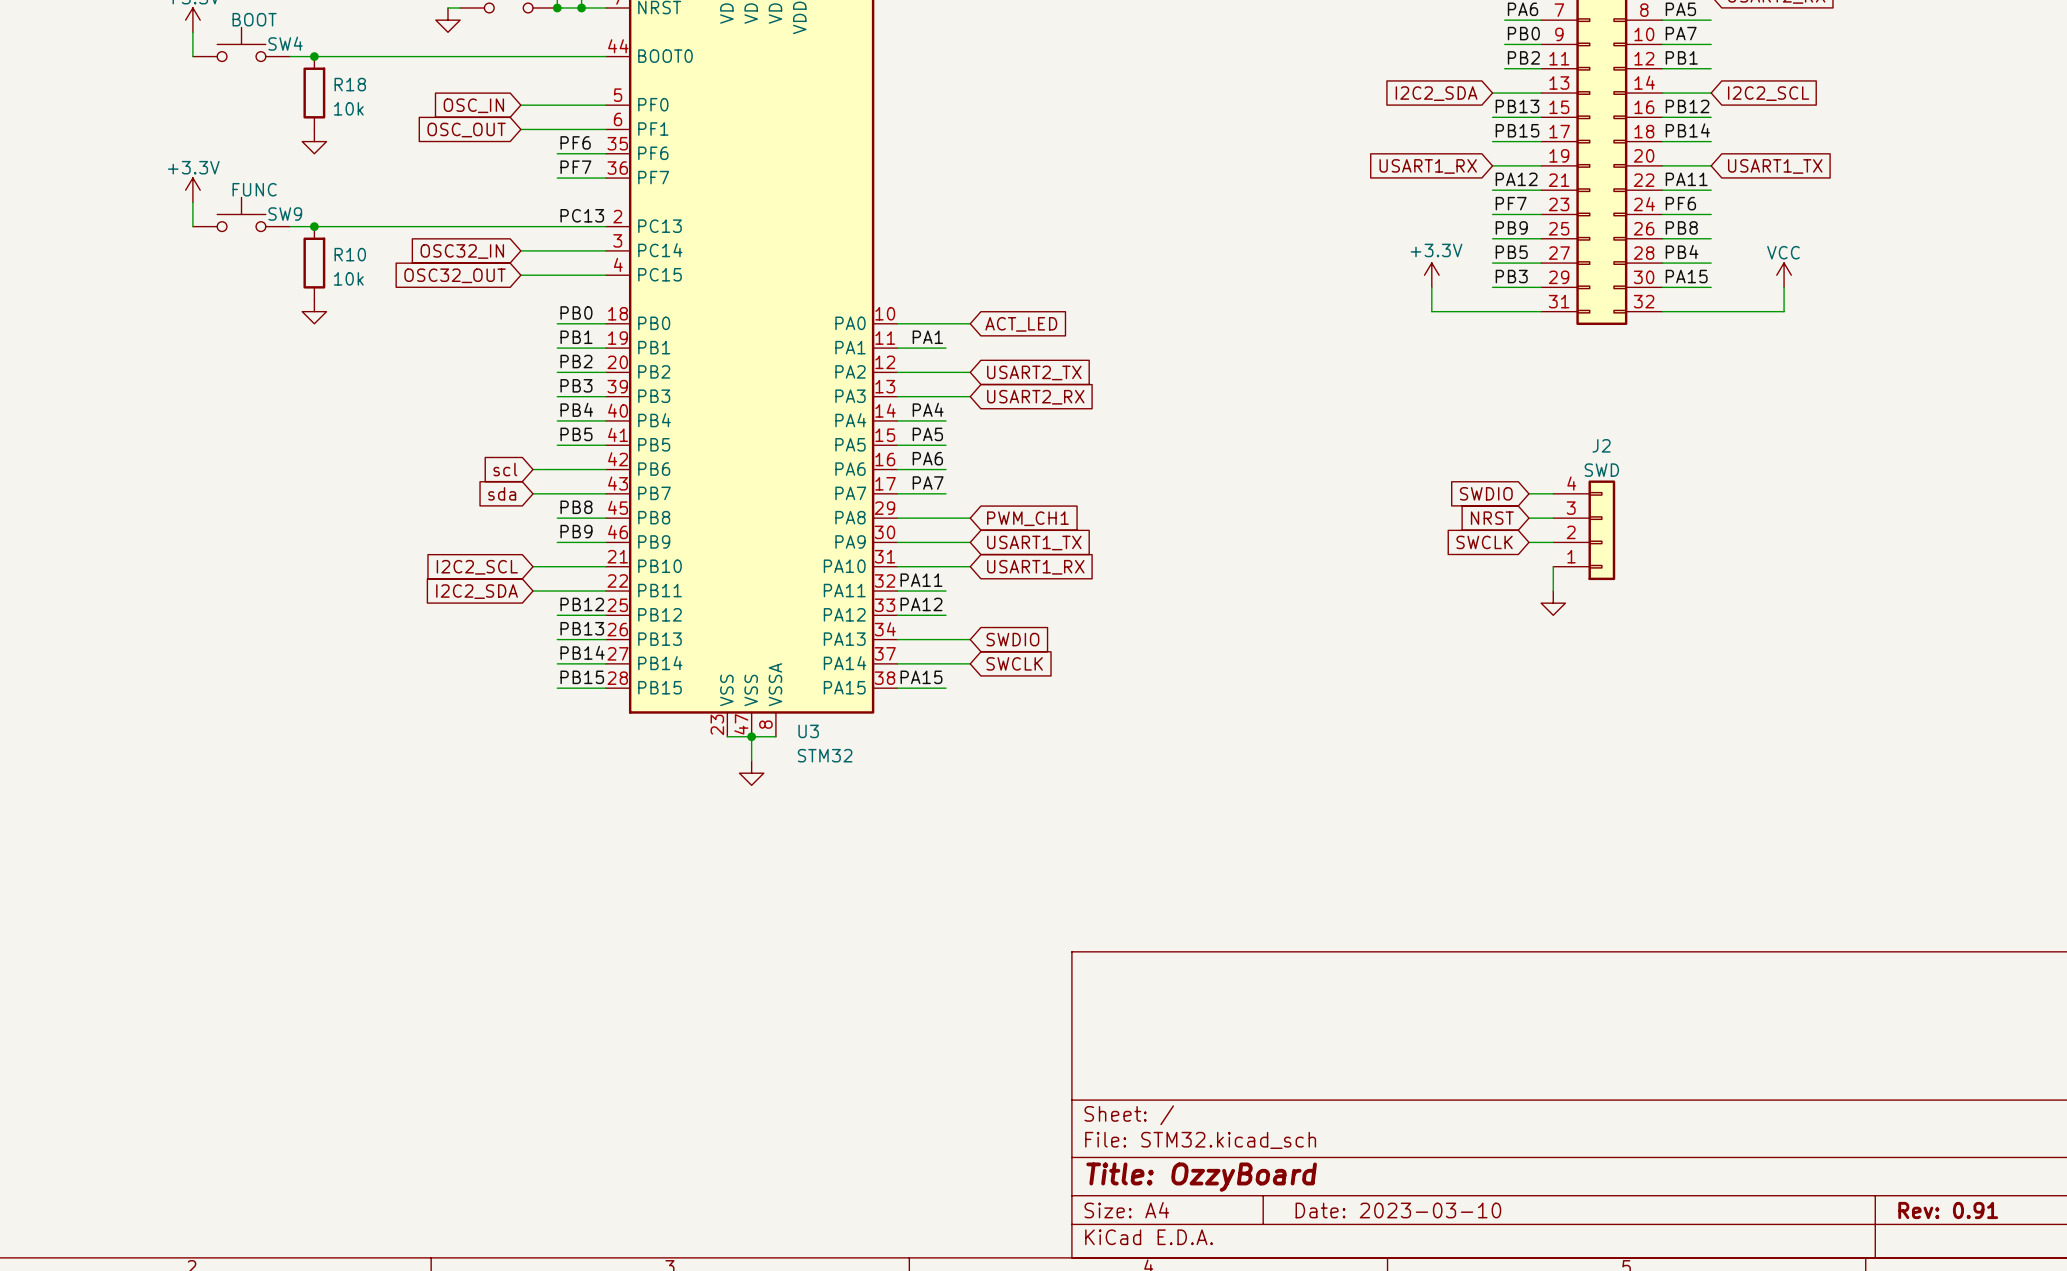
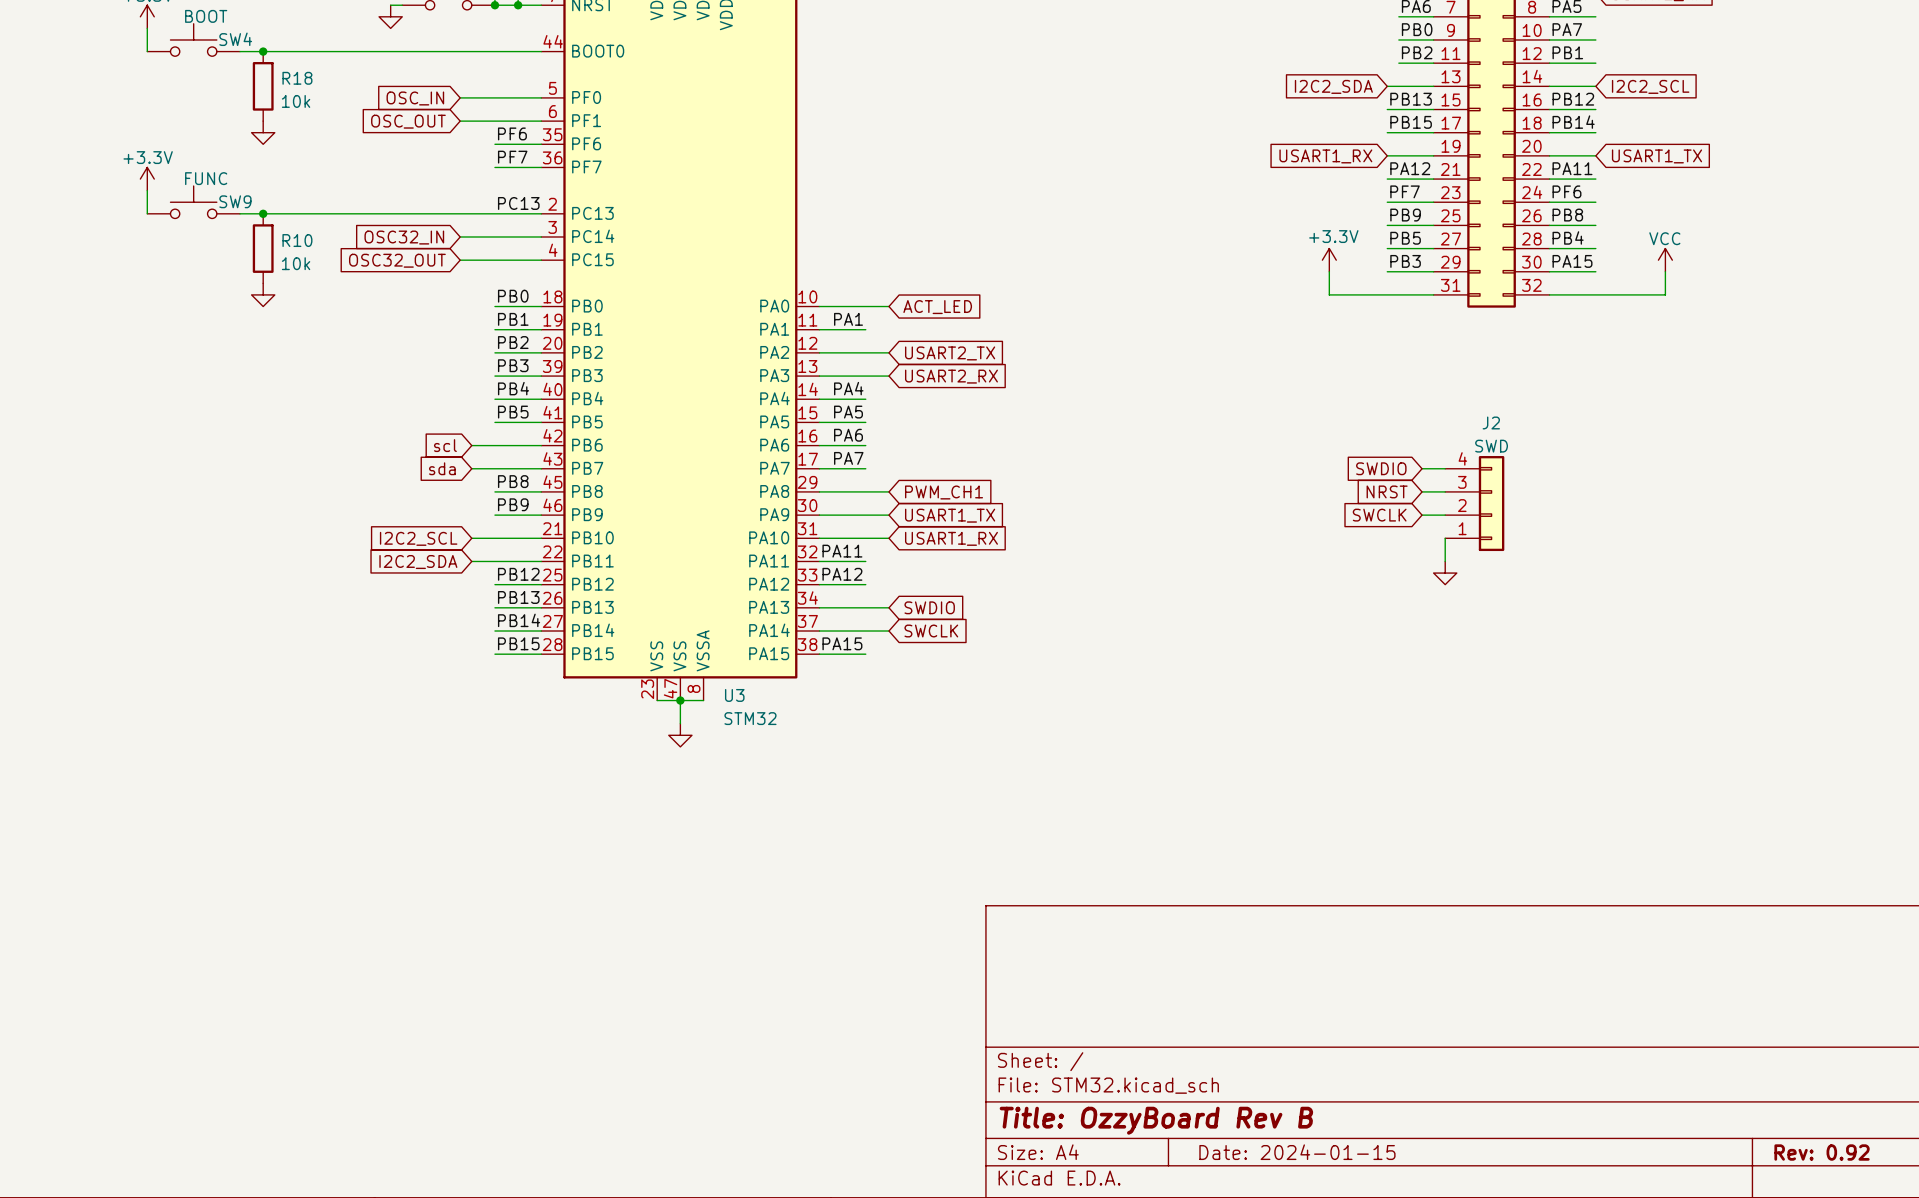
title block: Title: OzzyBoard (1201, 1177) -> Title: OzzyBoard Rev B (1156, 1120)
title block: Date: 2023-03-10 (1398, 1210) -> Date: 2024-01-15 (1297, 1152)
title block: Rev: 0.91 (1948, 1210) -> Rev: 0.92 (1822, 1152)

